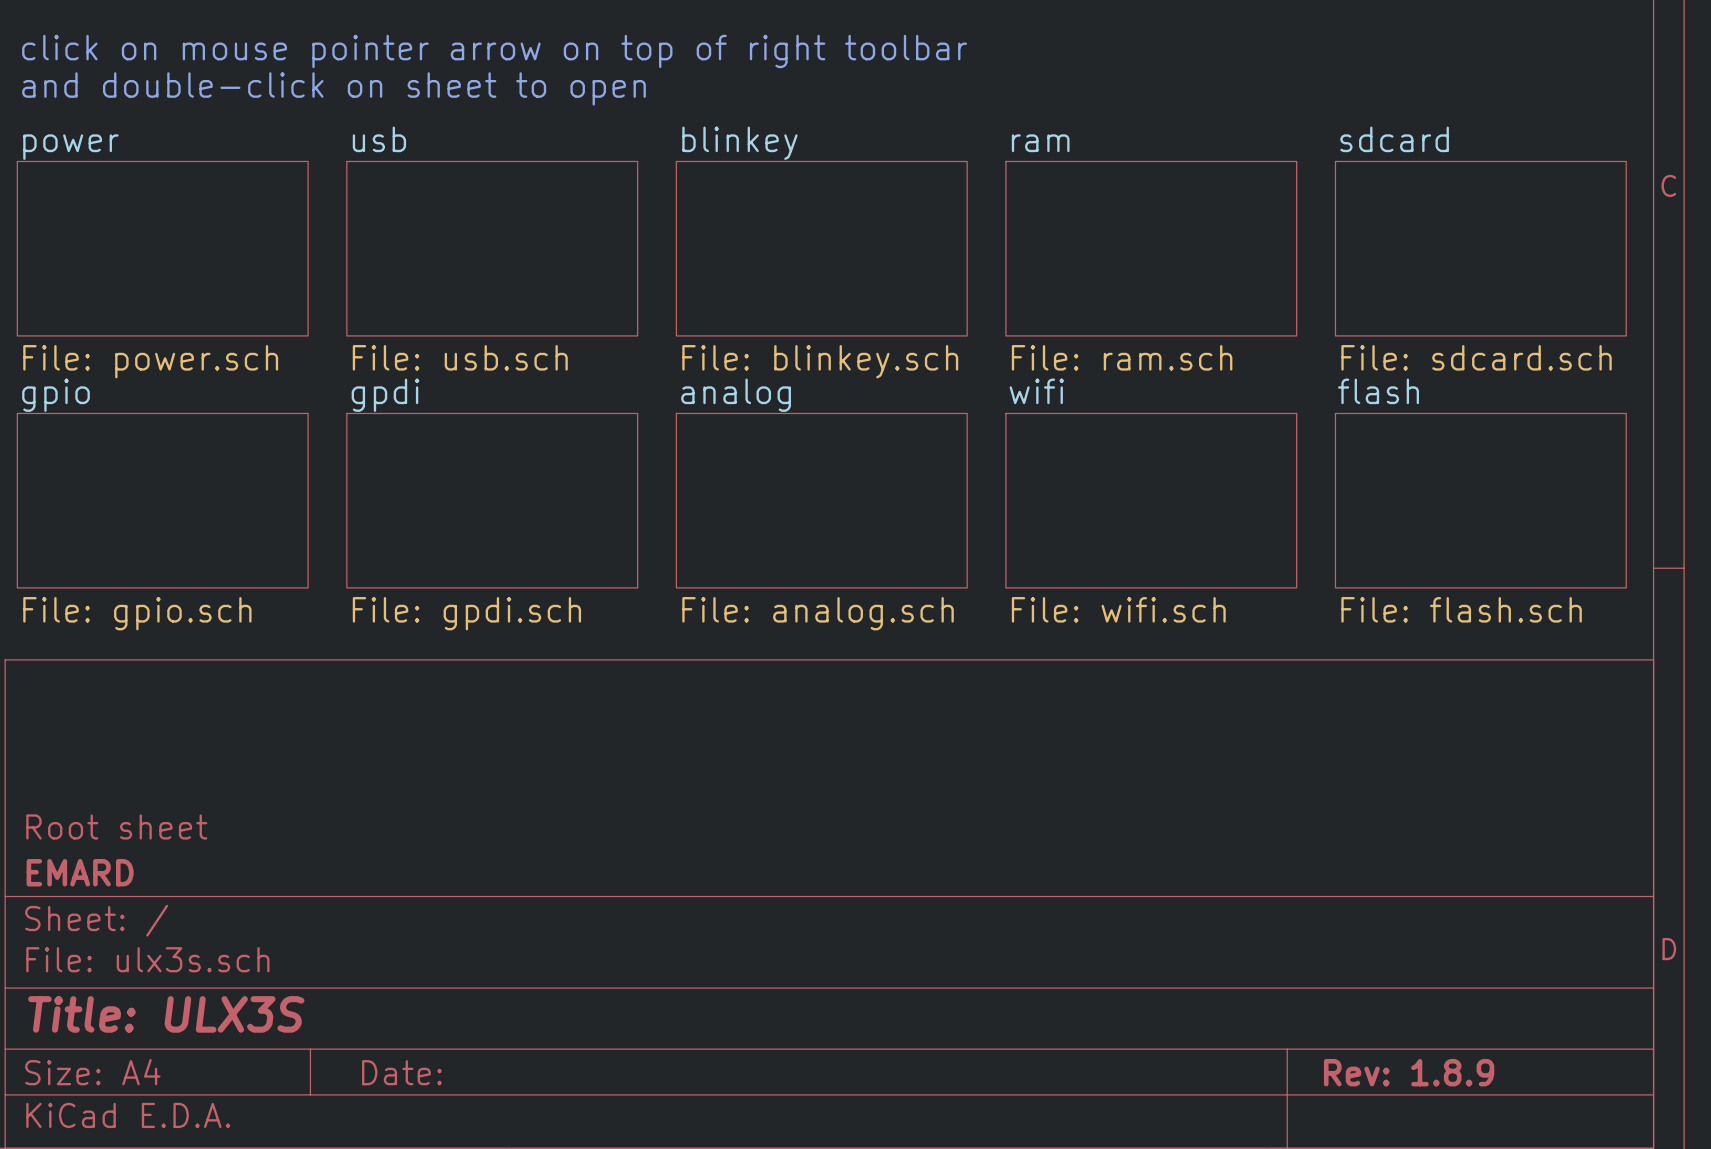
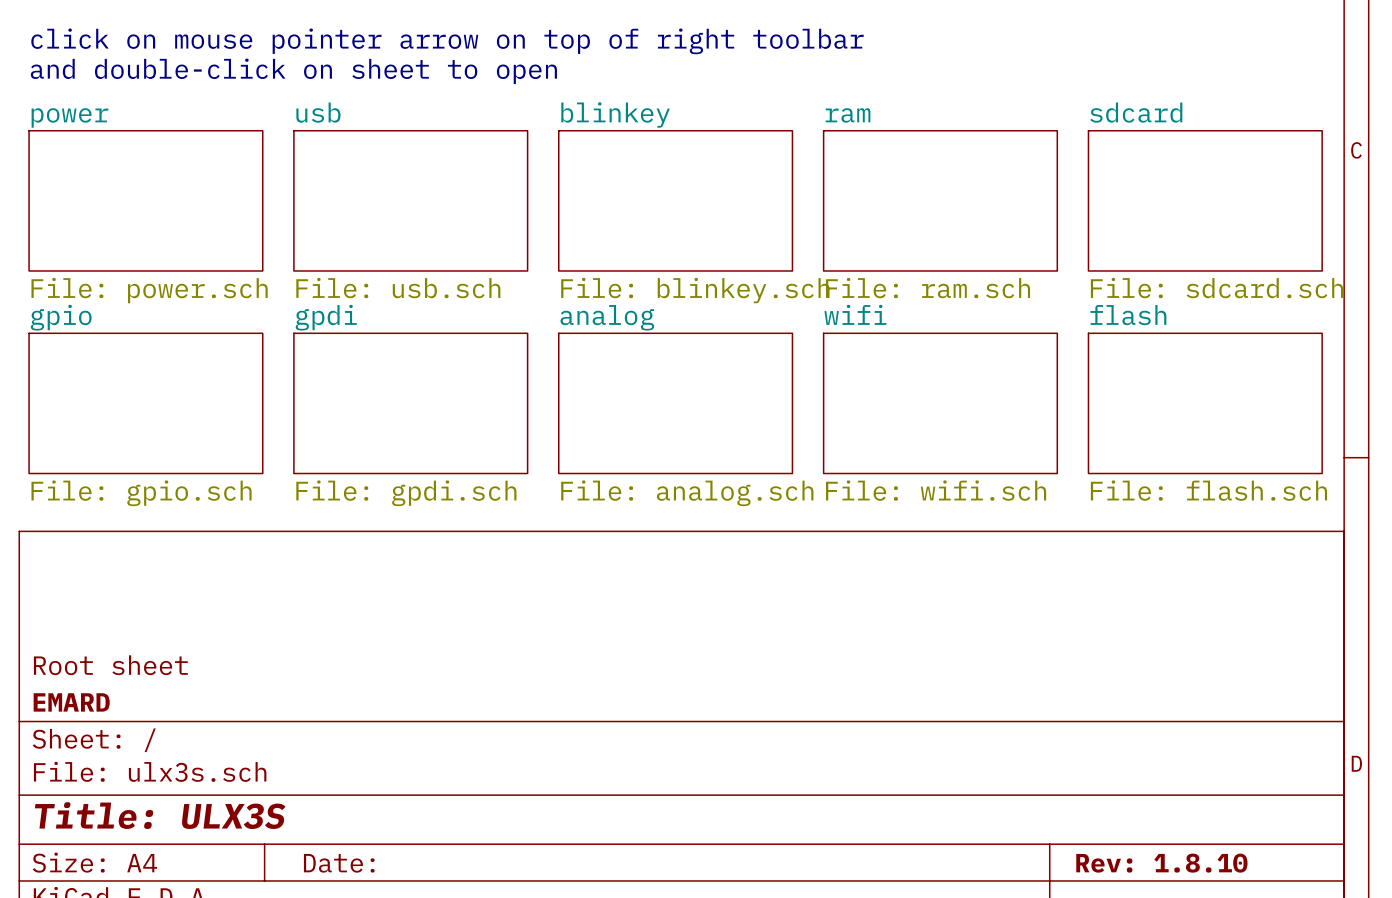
title block: Rev: 1.8.9 (1409, 1072) -> Rev: 1.8.10 (1161, 863)

